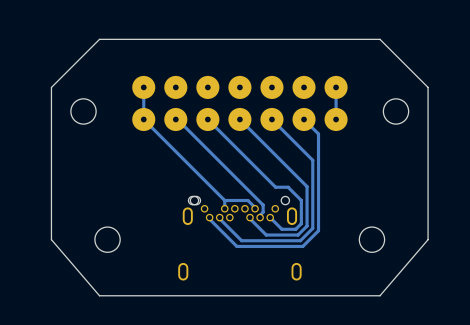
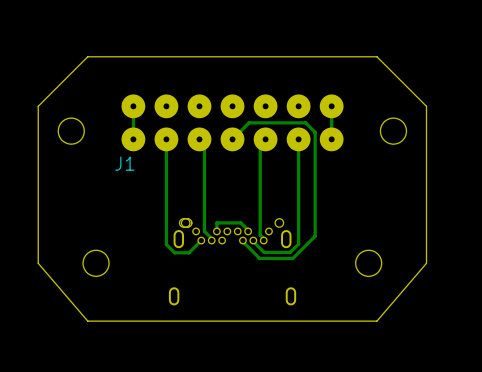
track: (143, 119) (224, 200) -> none
track: (175, 119) (263, 205) (263, 212) (260, 217) -> (166, 139) (166, 244) (174, 252) (189, 252) (201, 240)
track: (239, 119) (307, 186) (307, 226) (298, 235) -> (232, 139) (249, 122) (305, 122) (315, 132) (315, 236) (292, 258)
track: (271, 119) (312, 160) (312, 228) (300, 240) (241, 240) (219, 217) -> (265, 139) (260, 144) (260, 235) (263, 240)
track: (304, 119) (318, 133) (318, 230) (302, 246) (236, 246) (209, 217) -> (298, 139) (298, 244) (290, 252) (264, 252) (253, 240)
track: (212, 124) (275, 187) (288, 187) (301, 200) (301, 223) (295, 229) (281, 229) (270, 217) -> (204, 144) (204, 231) (211, 240)

